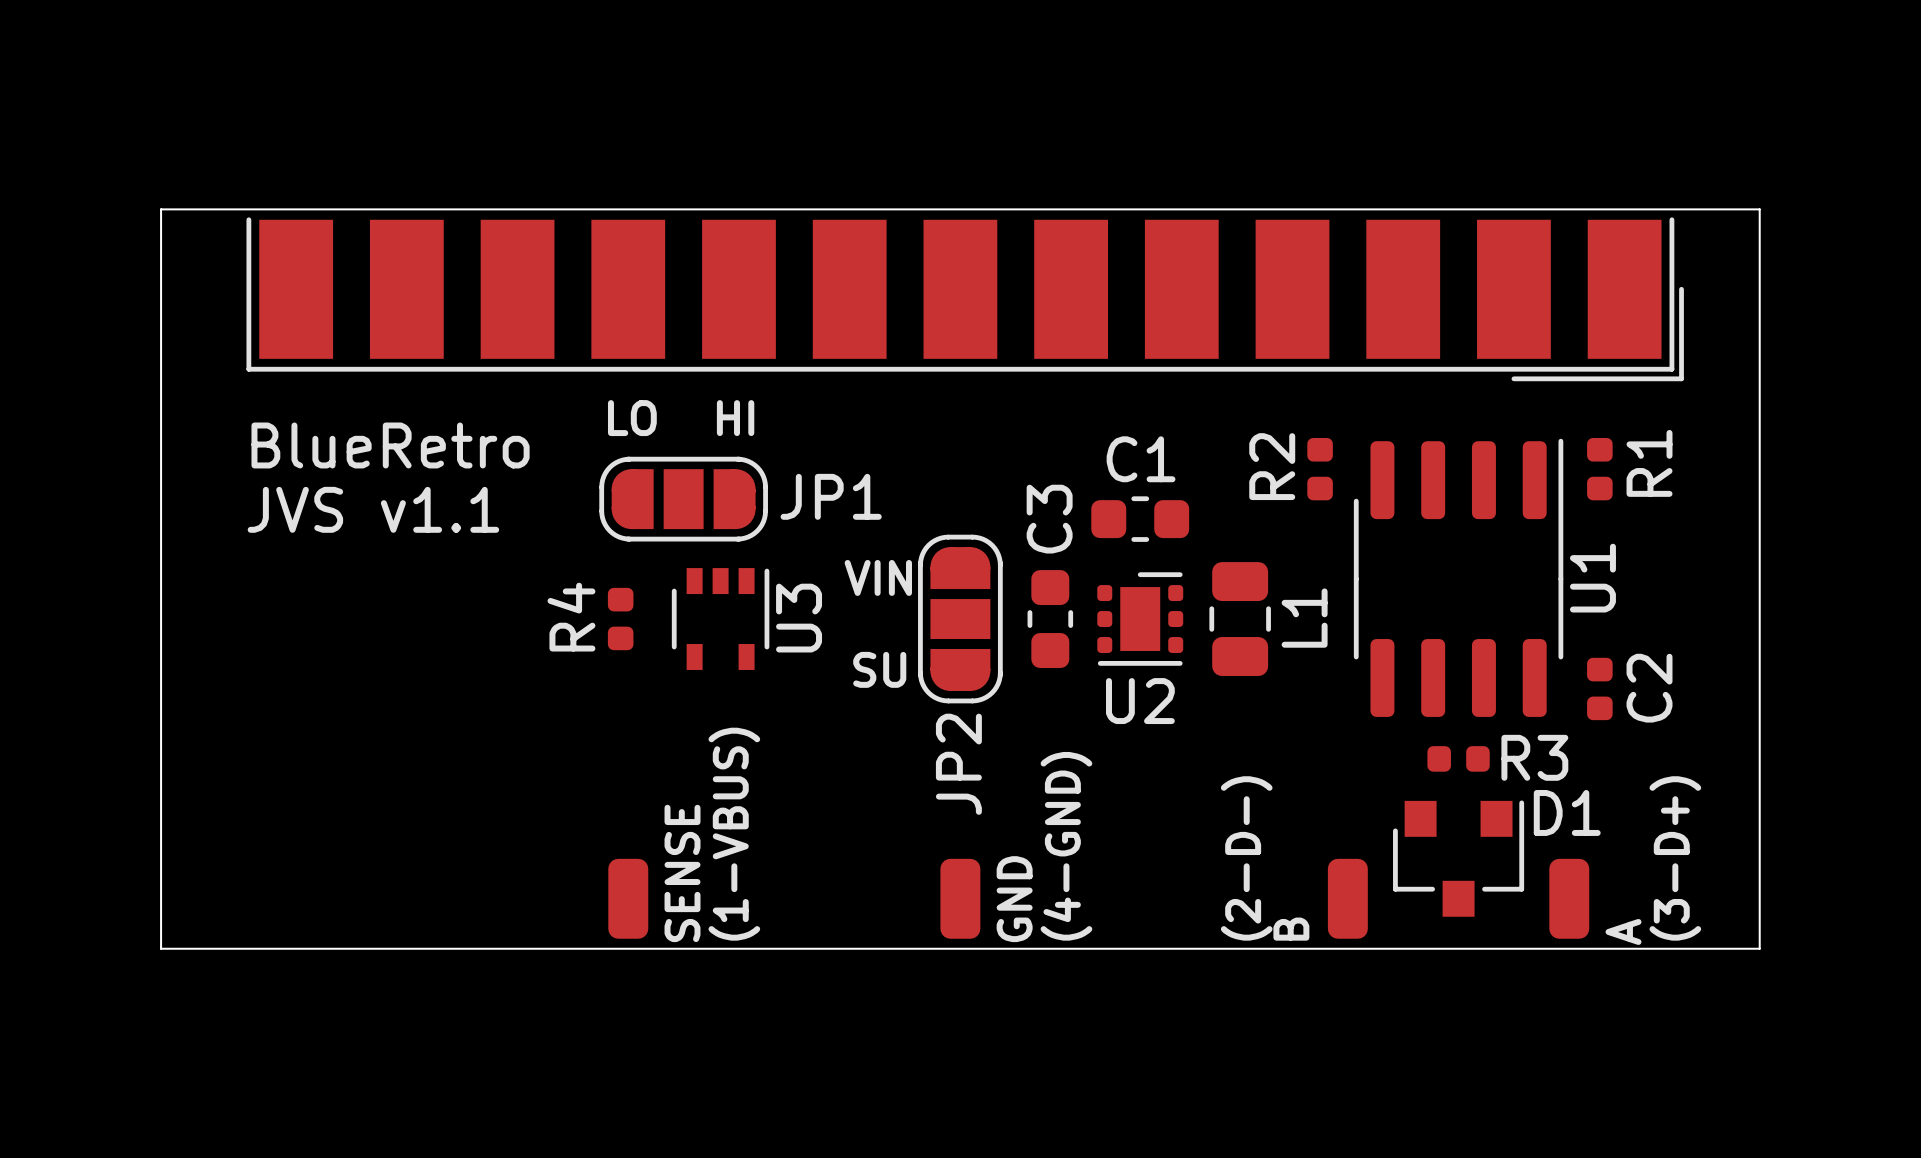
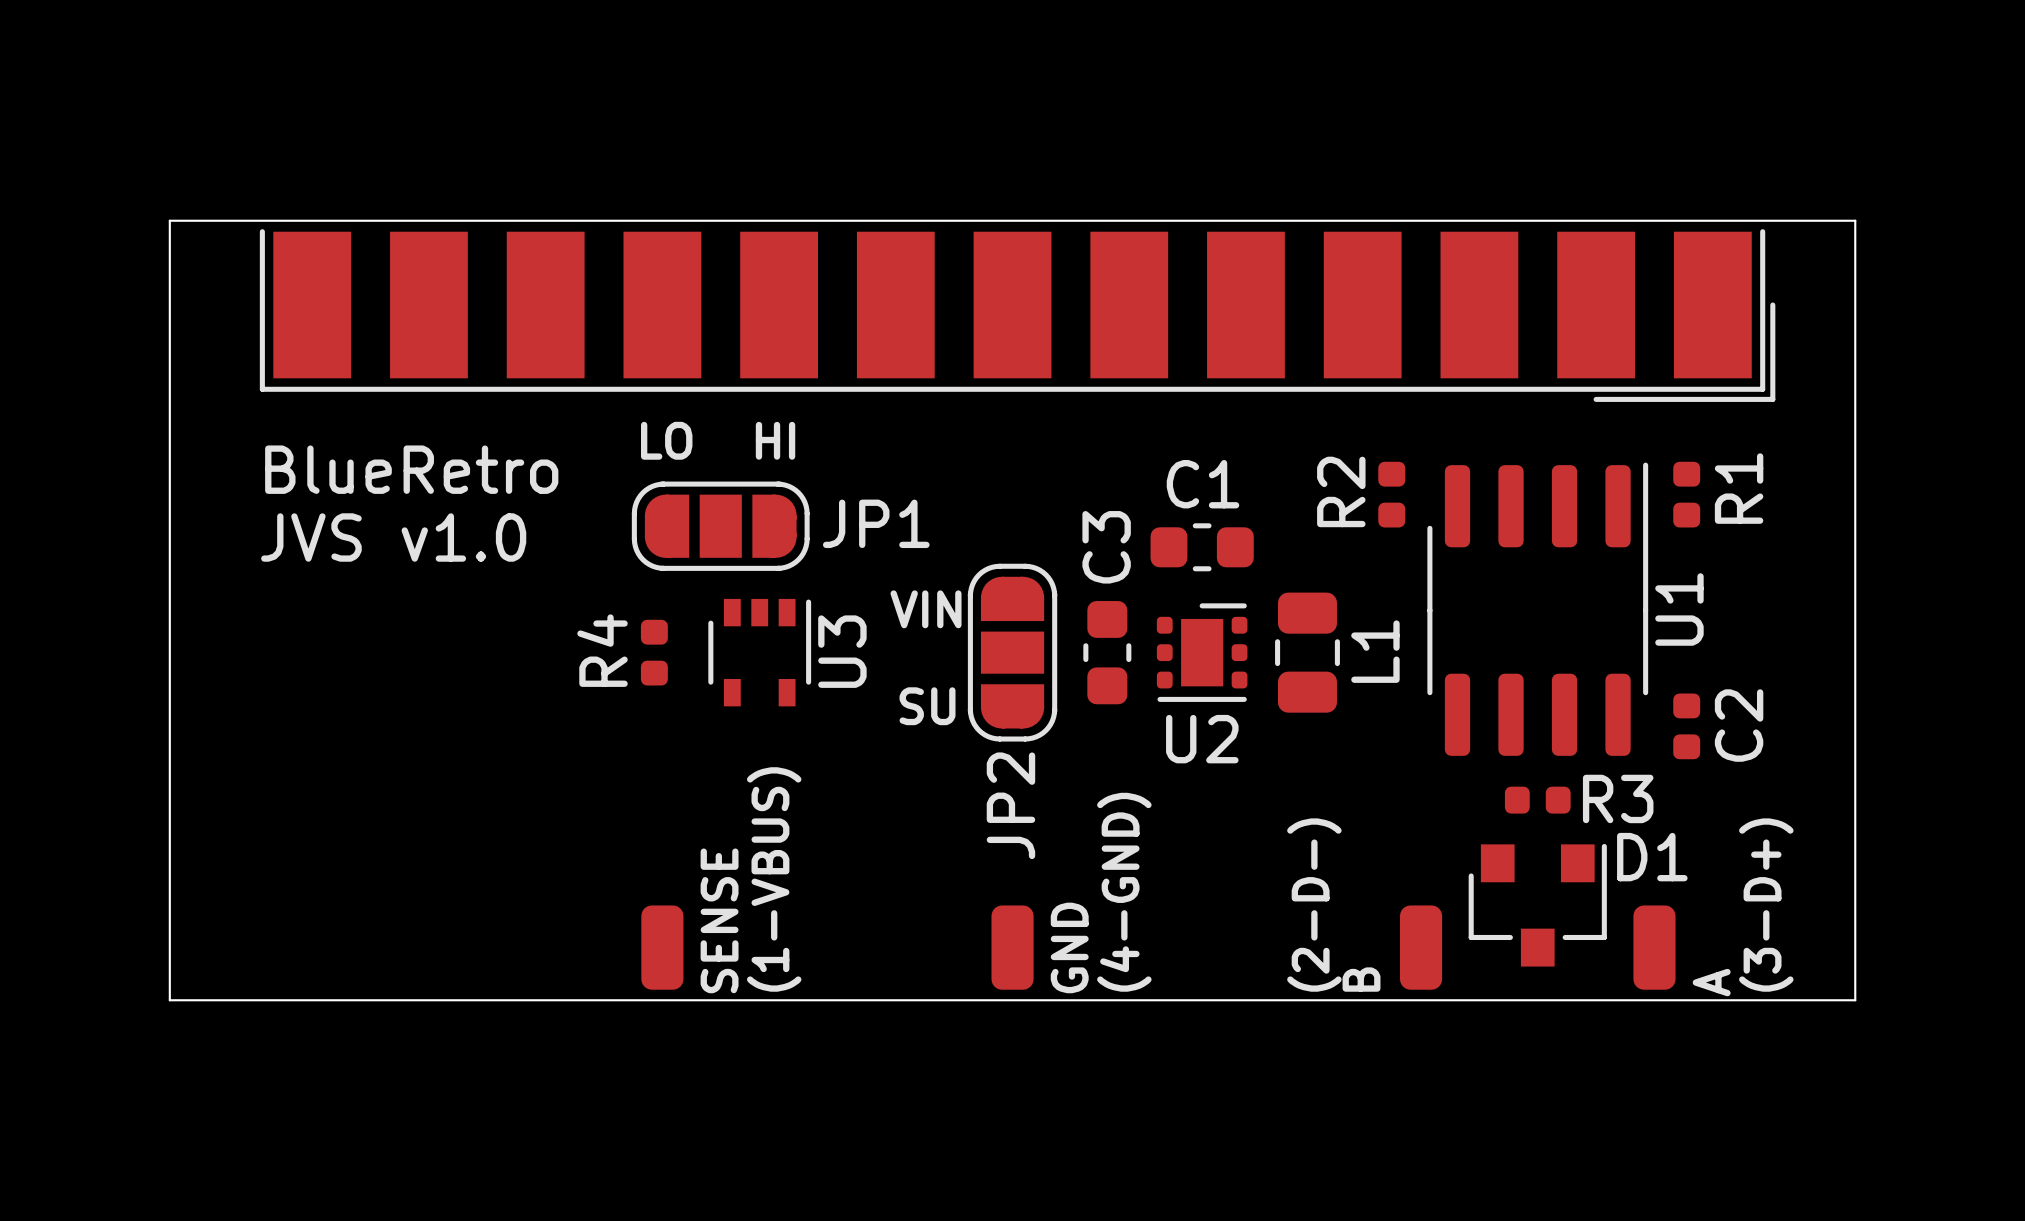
text: JVS v1.1 (373, 509) -> JVS v1.0 (393, 537)

